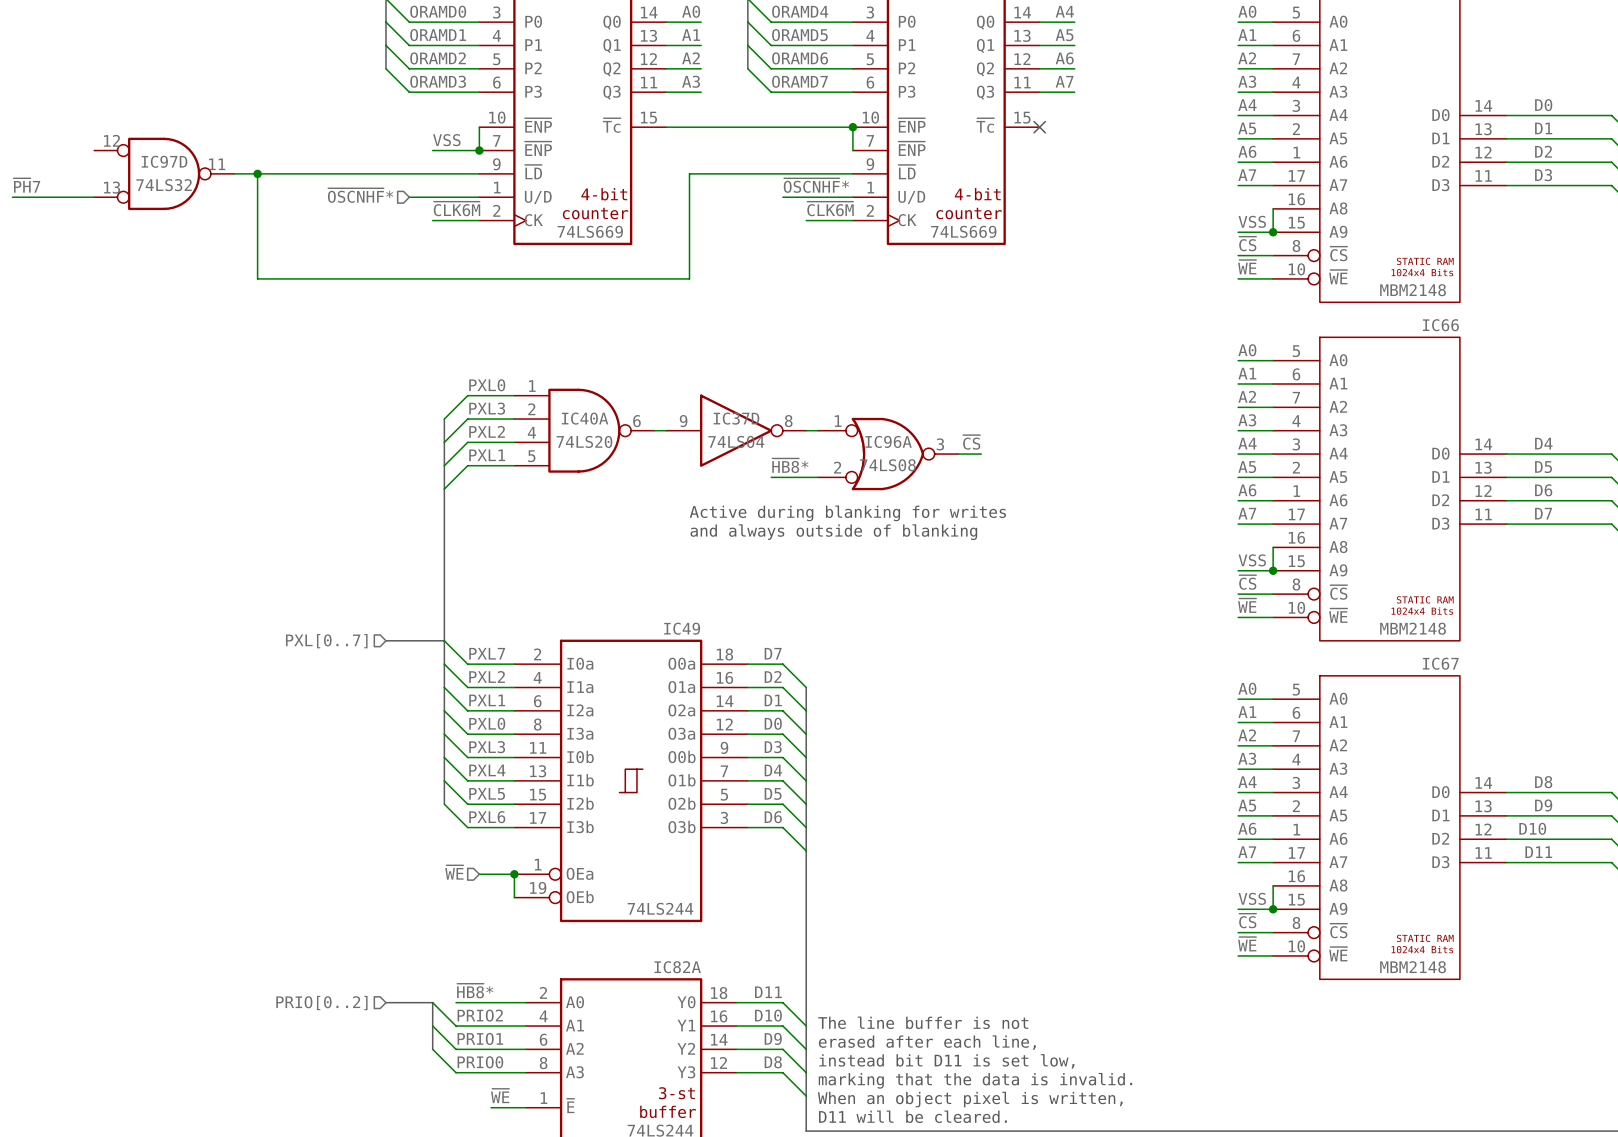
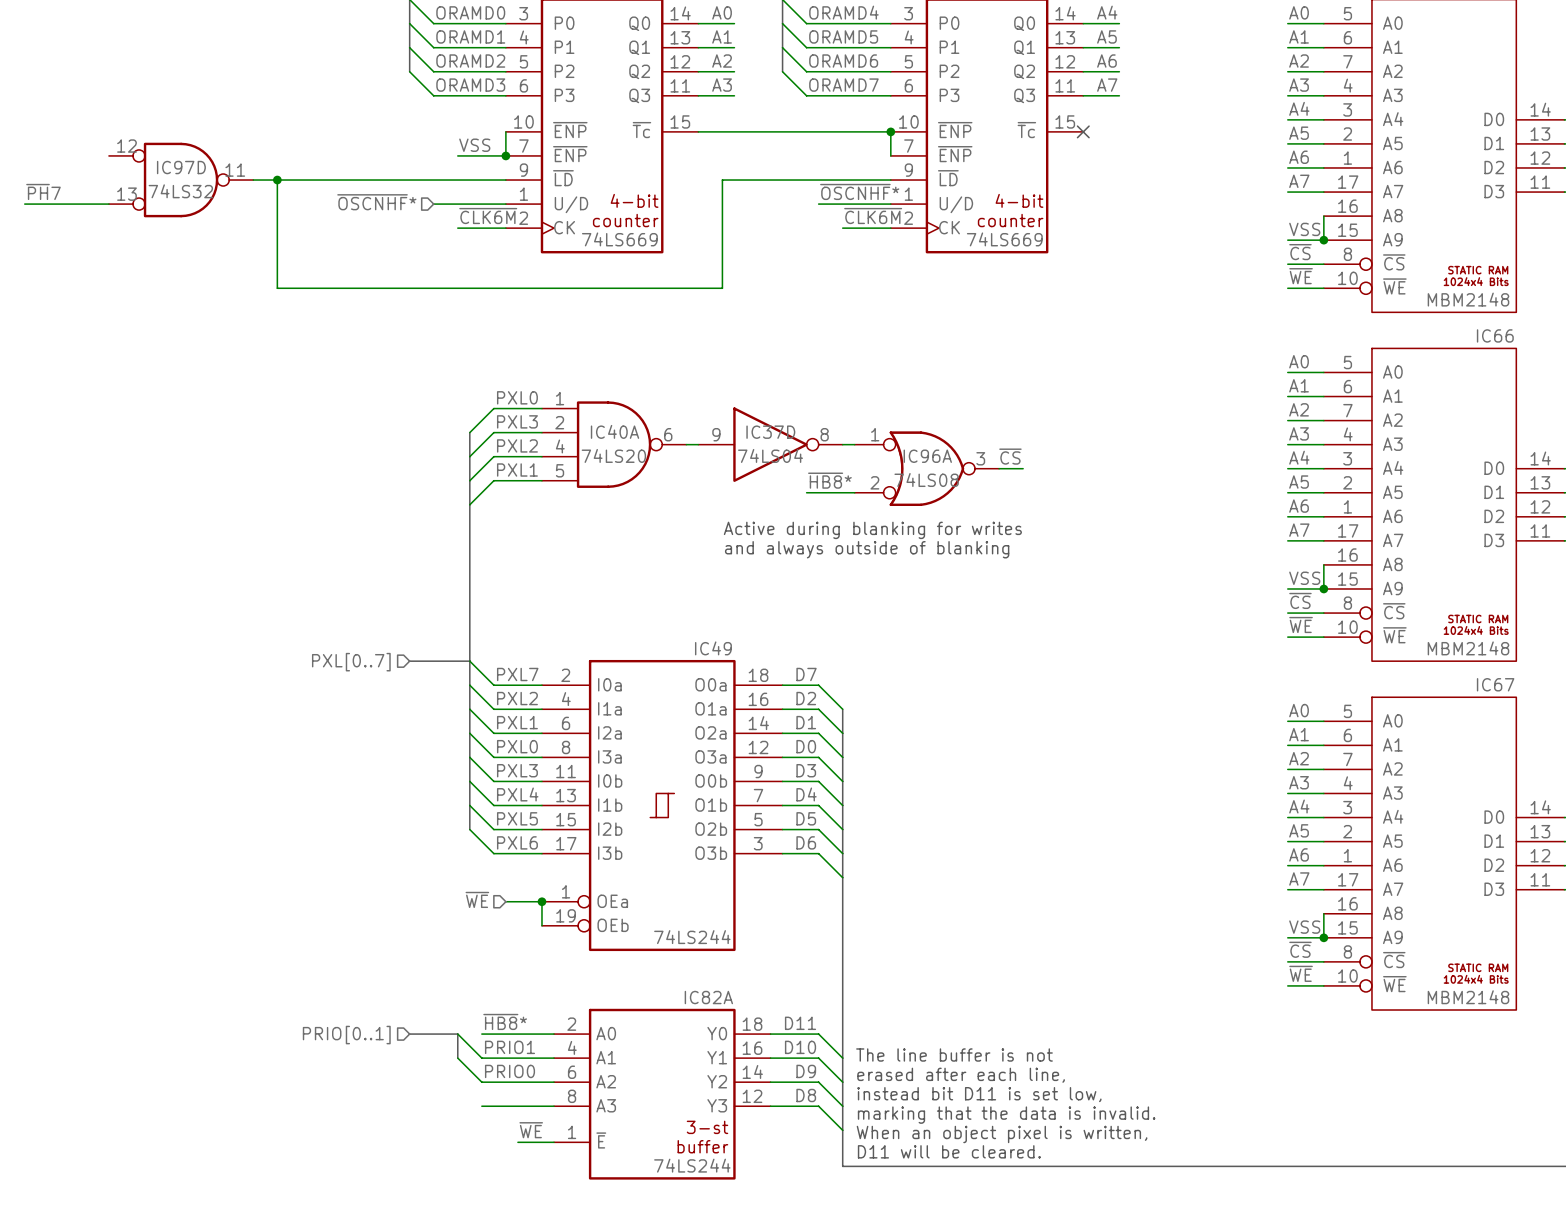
hierarchical label: PRIO[0..2] (321, 1003) -> PRIO[0..1] (346, 1035)
label: PRIO2 (480, 1015) -> PRIO1 (510, 1047)
bus: (432, 1026) (432, 1049) -> none
label: PRIO1 (480, 1038) -> PRIO0 (510, 1071)
wire: (432, 1049) (456, 1072) -> none
label: PRIO0 (480, 1062) -> none

